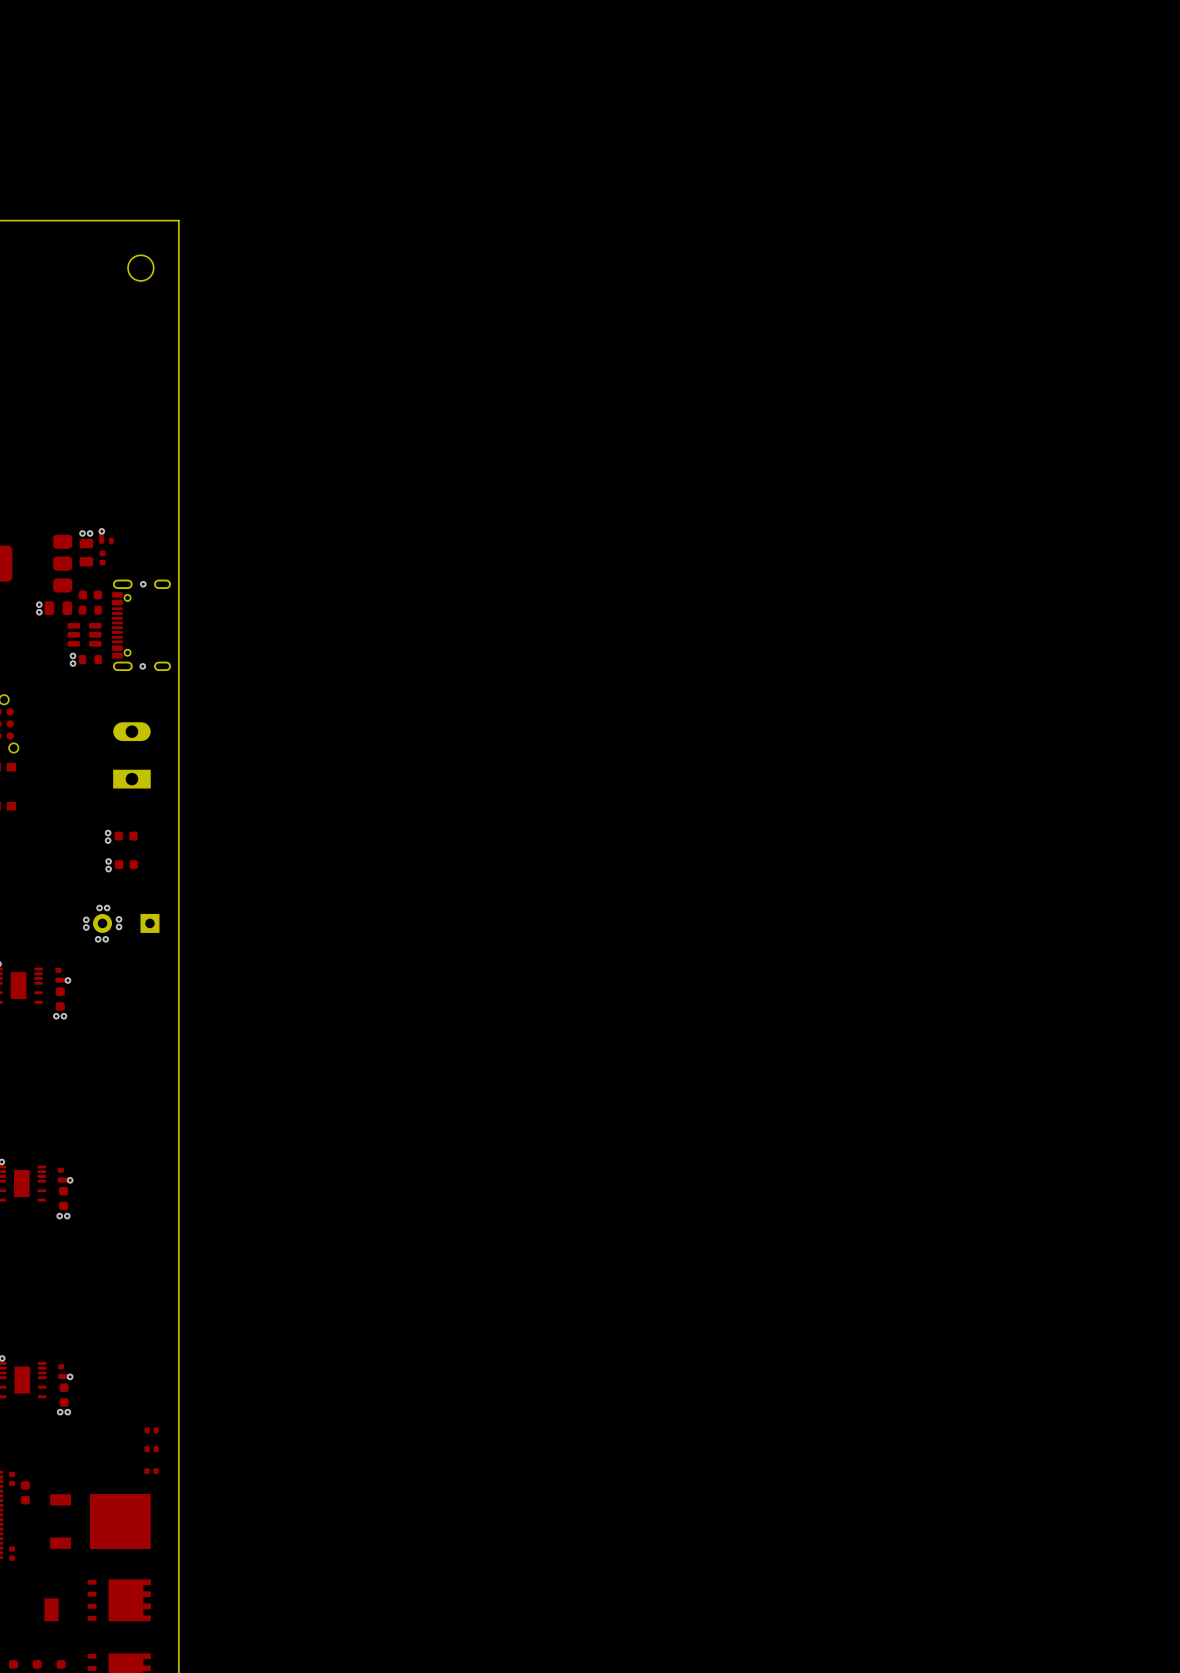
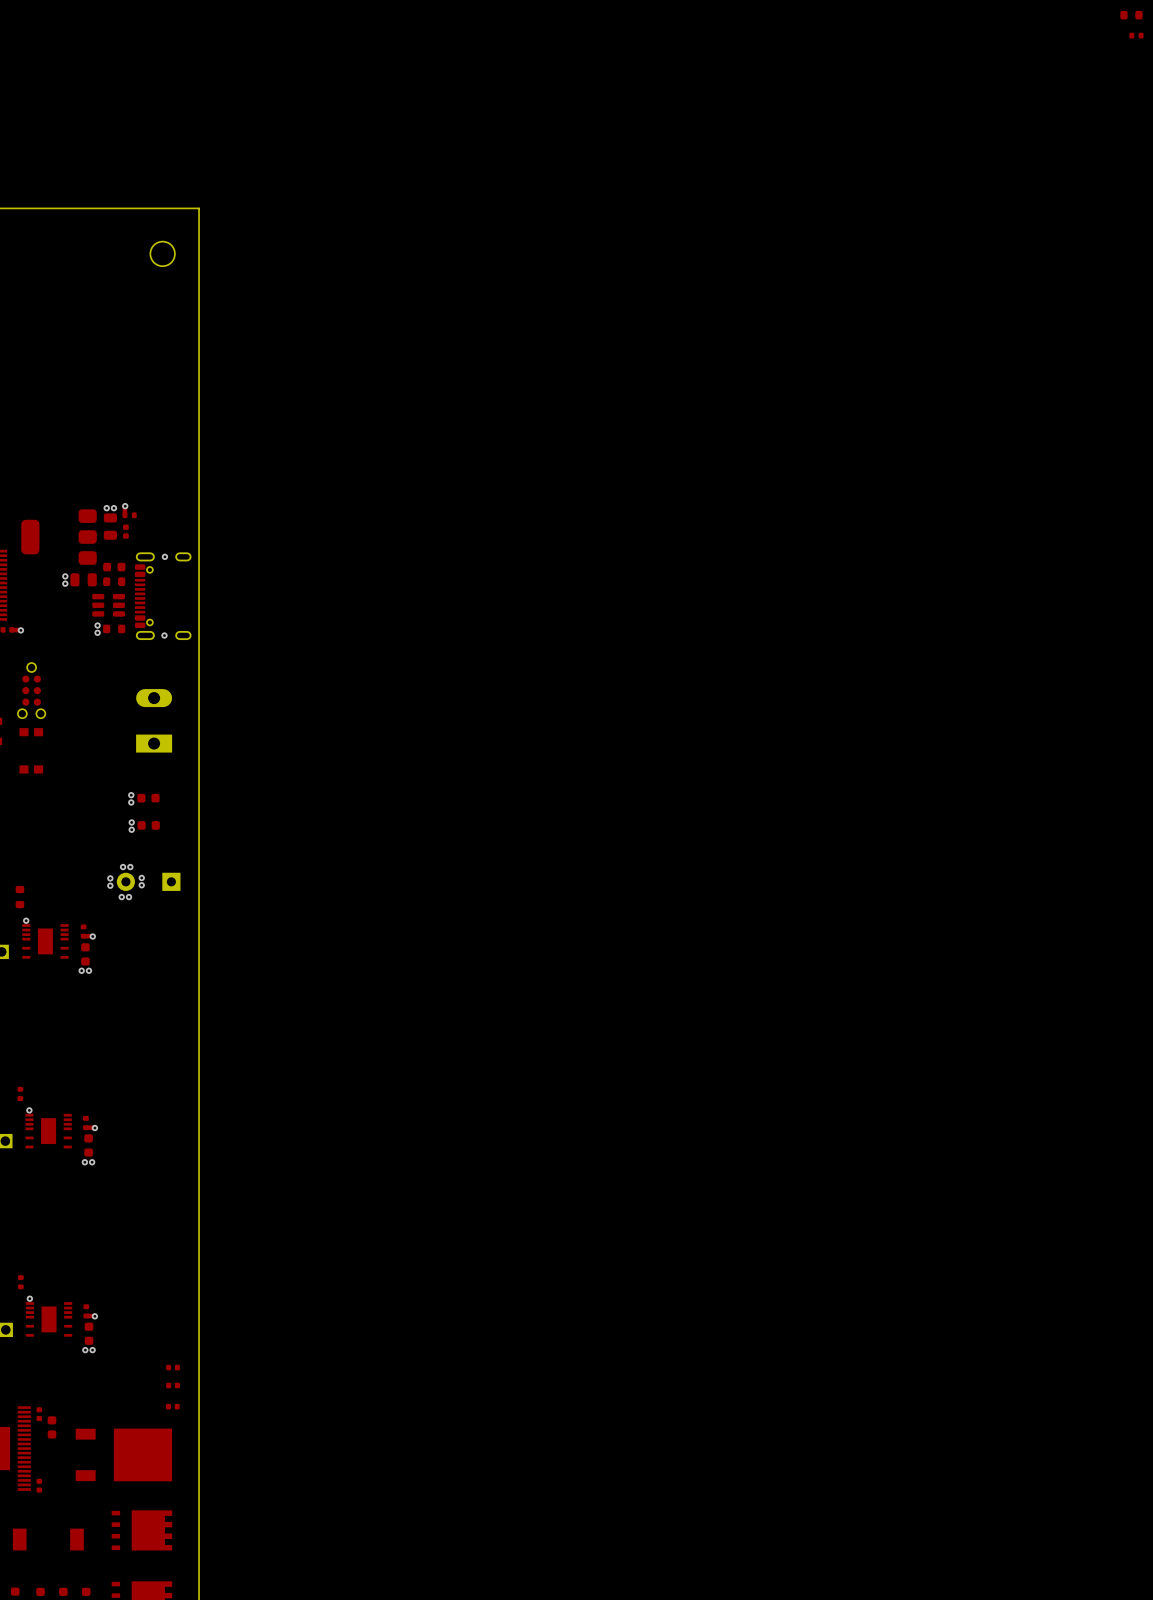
part: none -> (1131, 15)
part: none -> (1136, 35)

